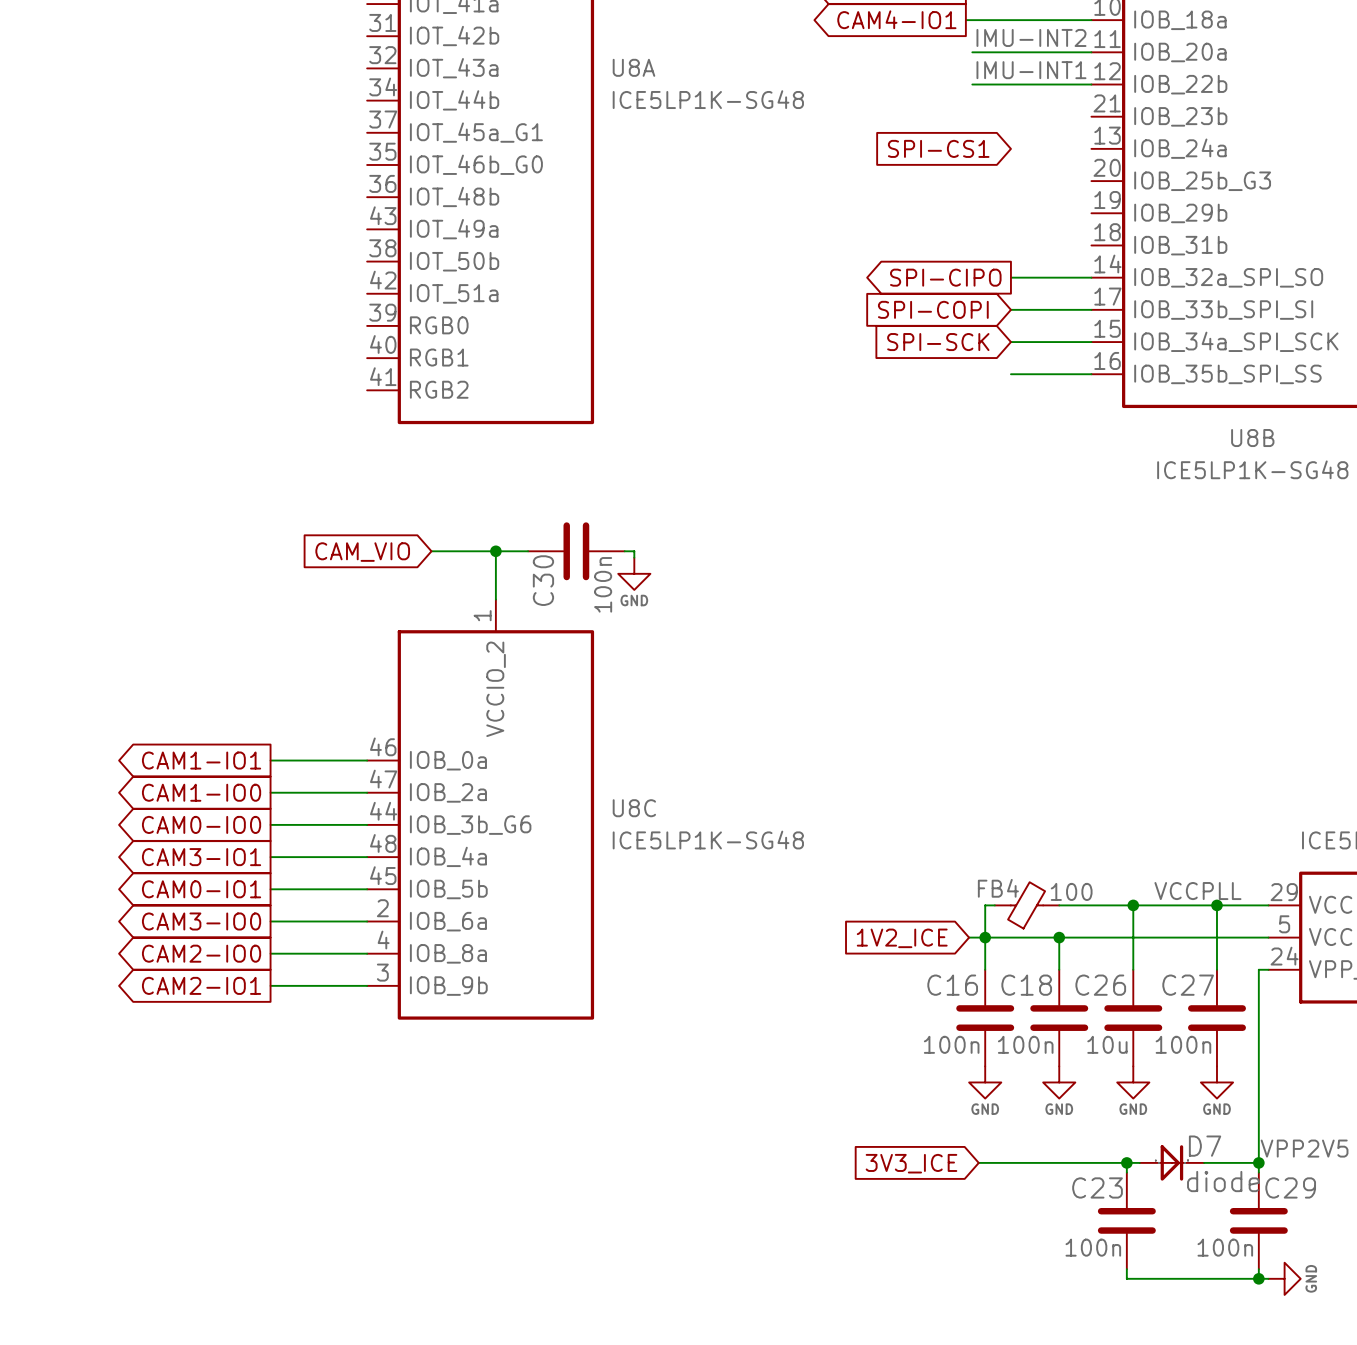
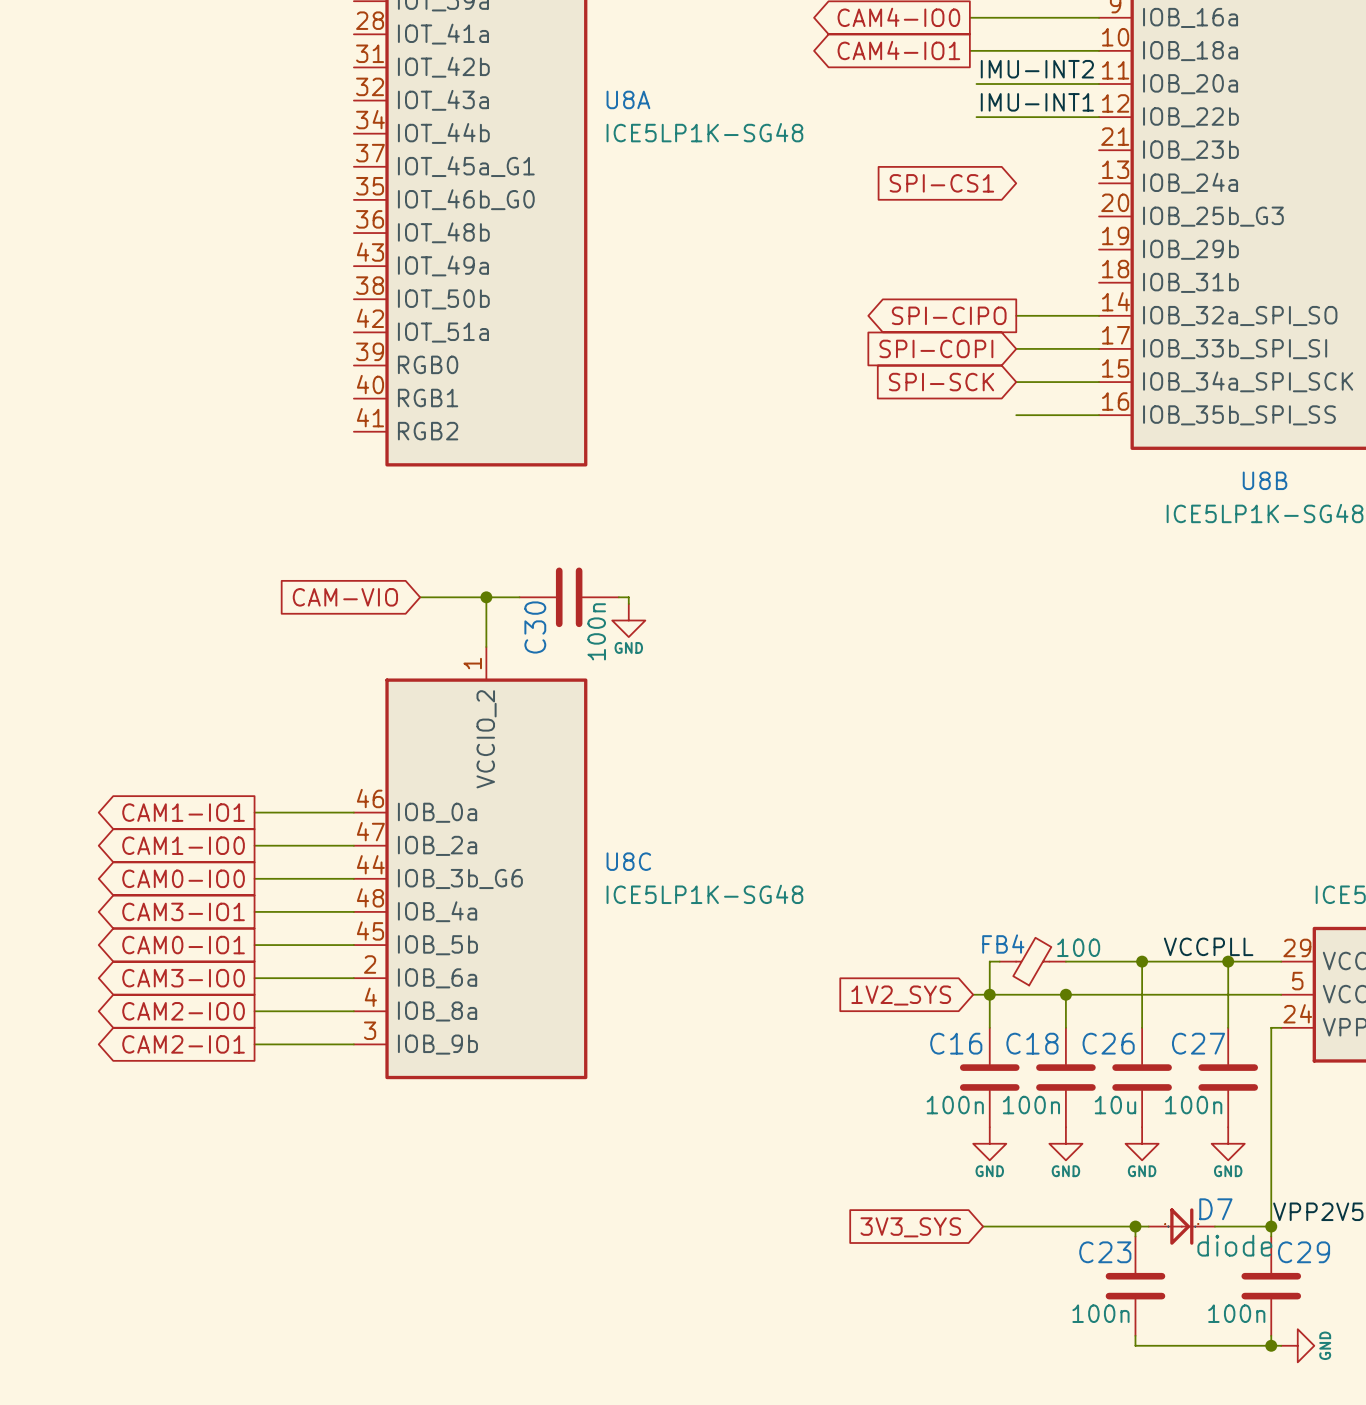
global label: CAM_VIO (362, 552) -> CAM-VIO (345, 597)
global label: 1V2_ICE (902, 938) -> 1V2_SYS (901, 995)
global label: 3V3_ICE (911, 1163) -> 3V3_SYS (910, 1227)

